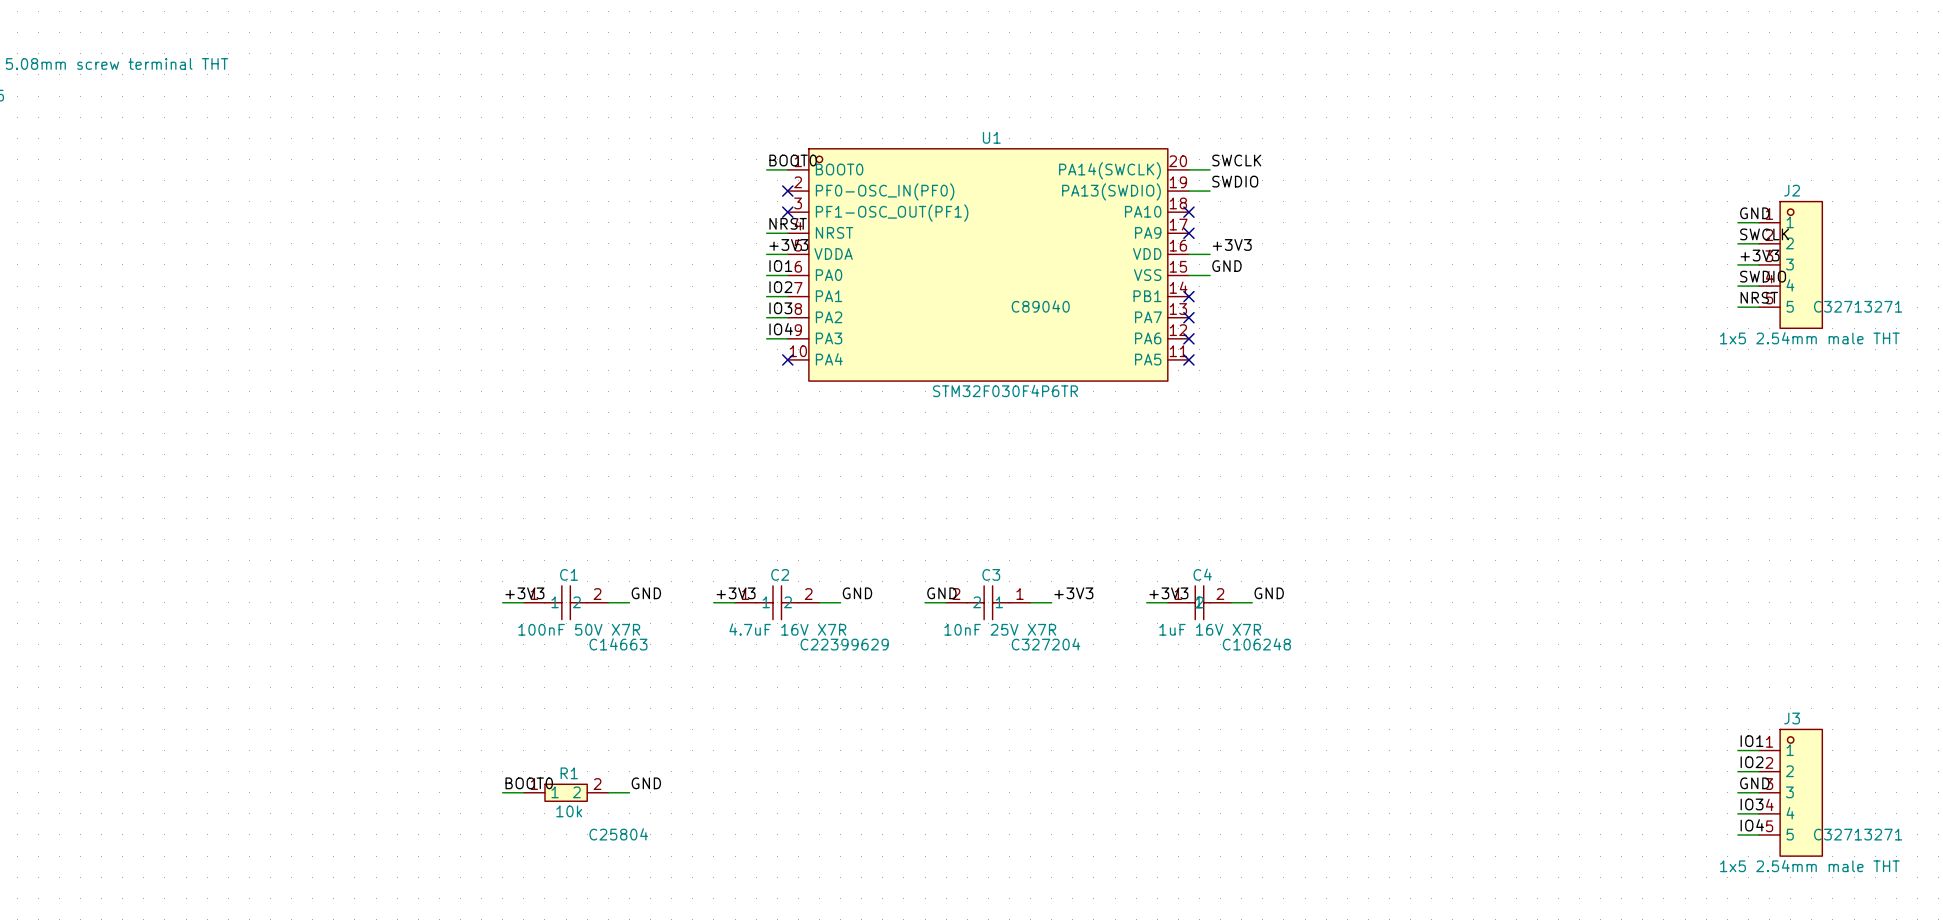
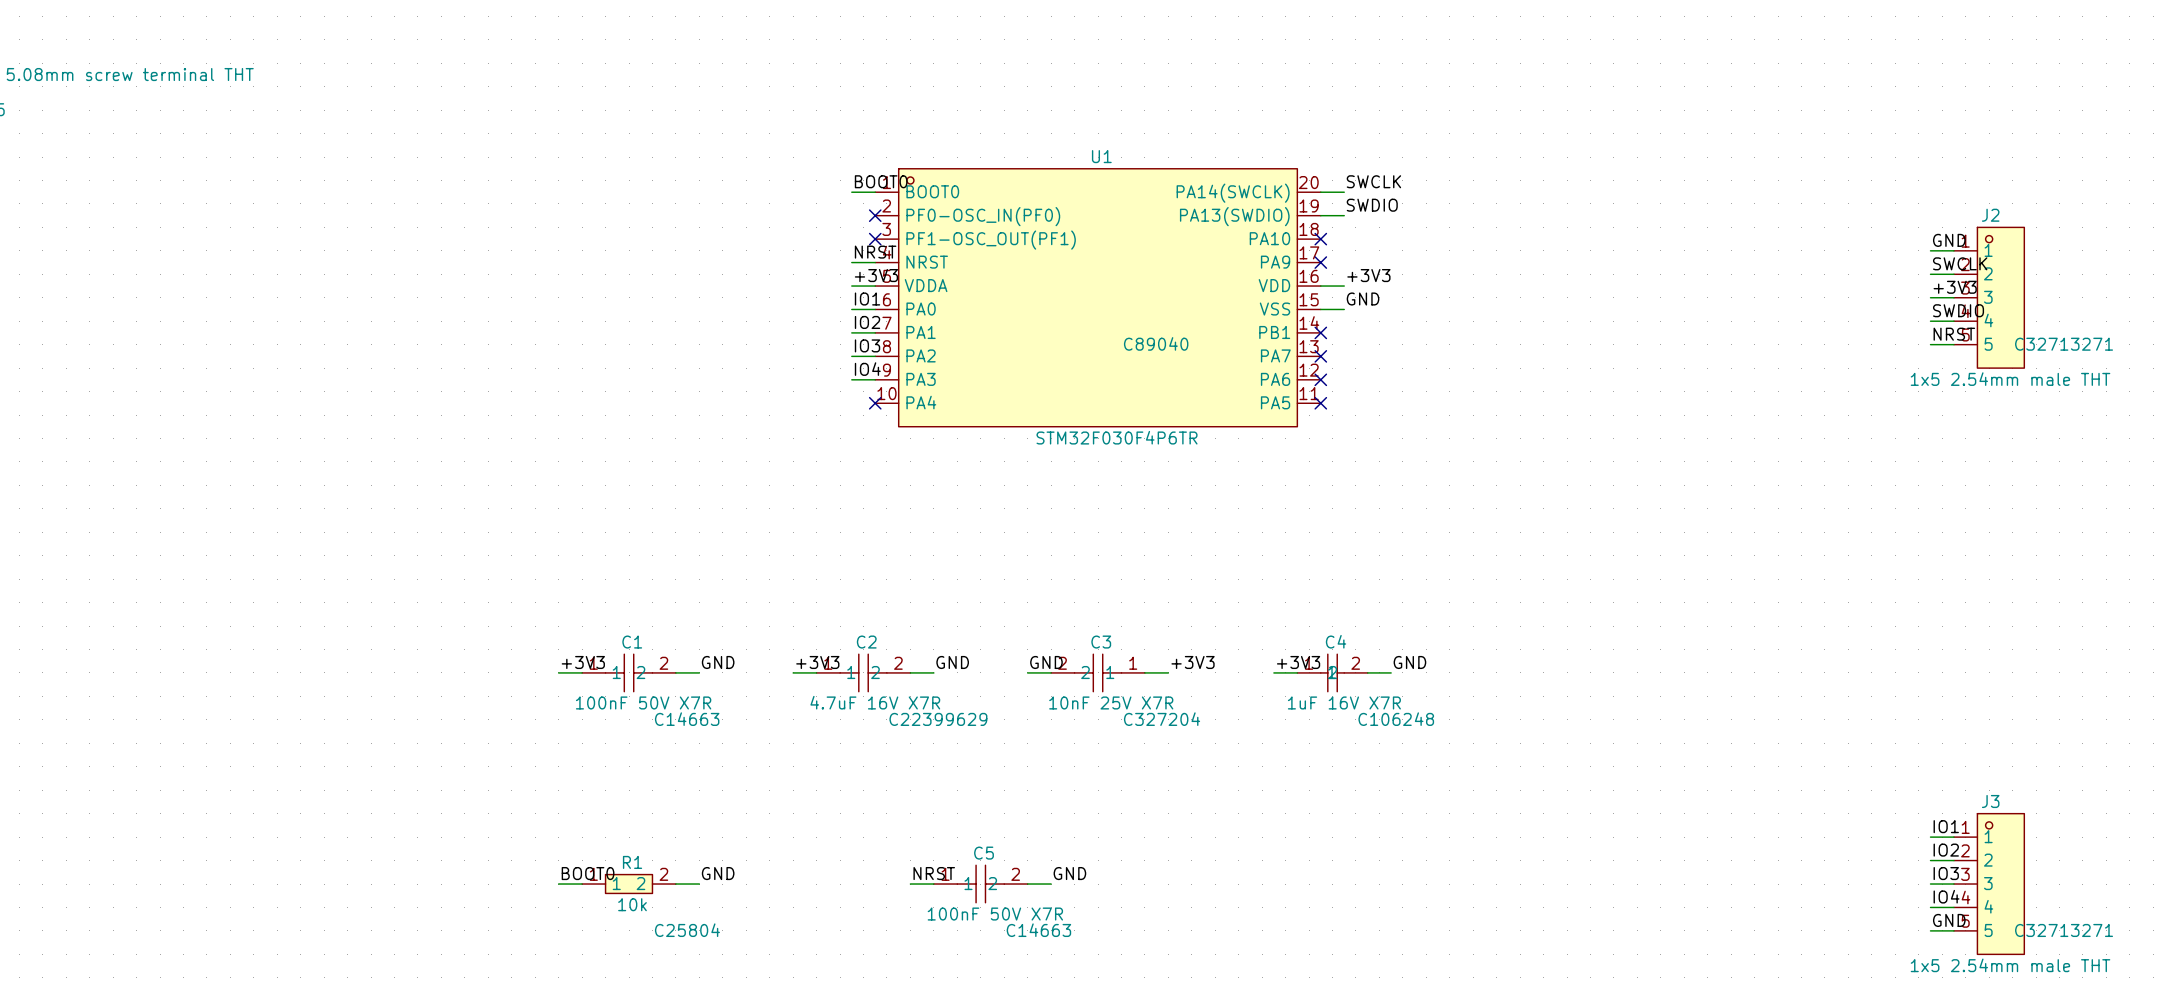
label: none -> NRST (934, 873)
label: none -> GND (1069, 873)
label: GND (1754, 783) -> IO3 (1946, 873)
wire: none -> (910, 884) (933, 884)
C5: none -> 100nF 50V X7R (980, 884)
wire: none -> (1027, 884) (1051, 884)
label: IO3 (1752, 804) -> IO4 (1946, 896)
label: IO4 (1752, 825) -> GND (1949, 920)

